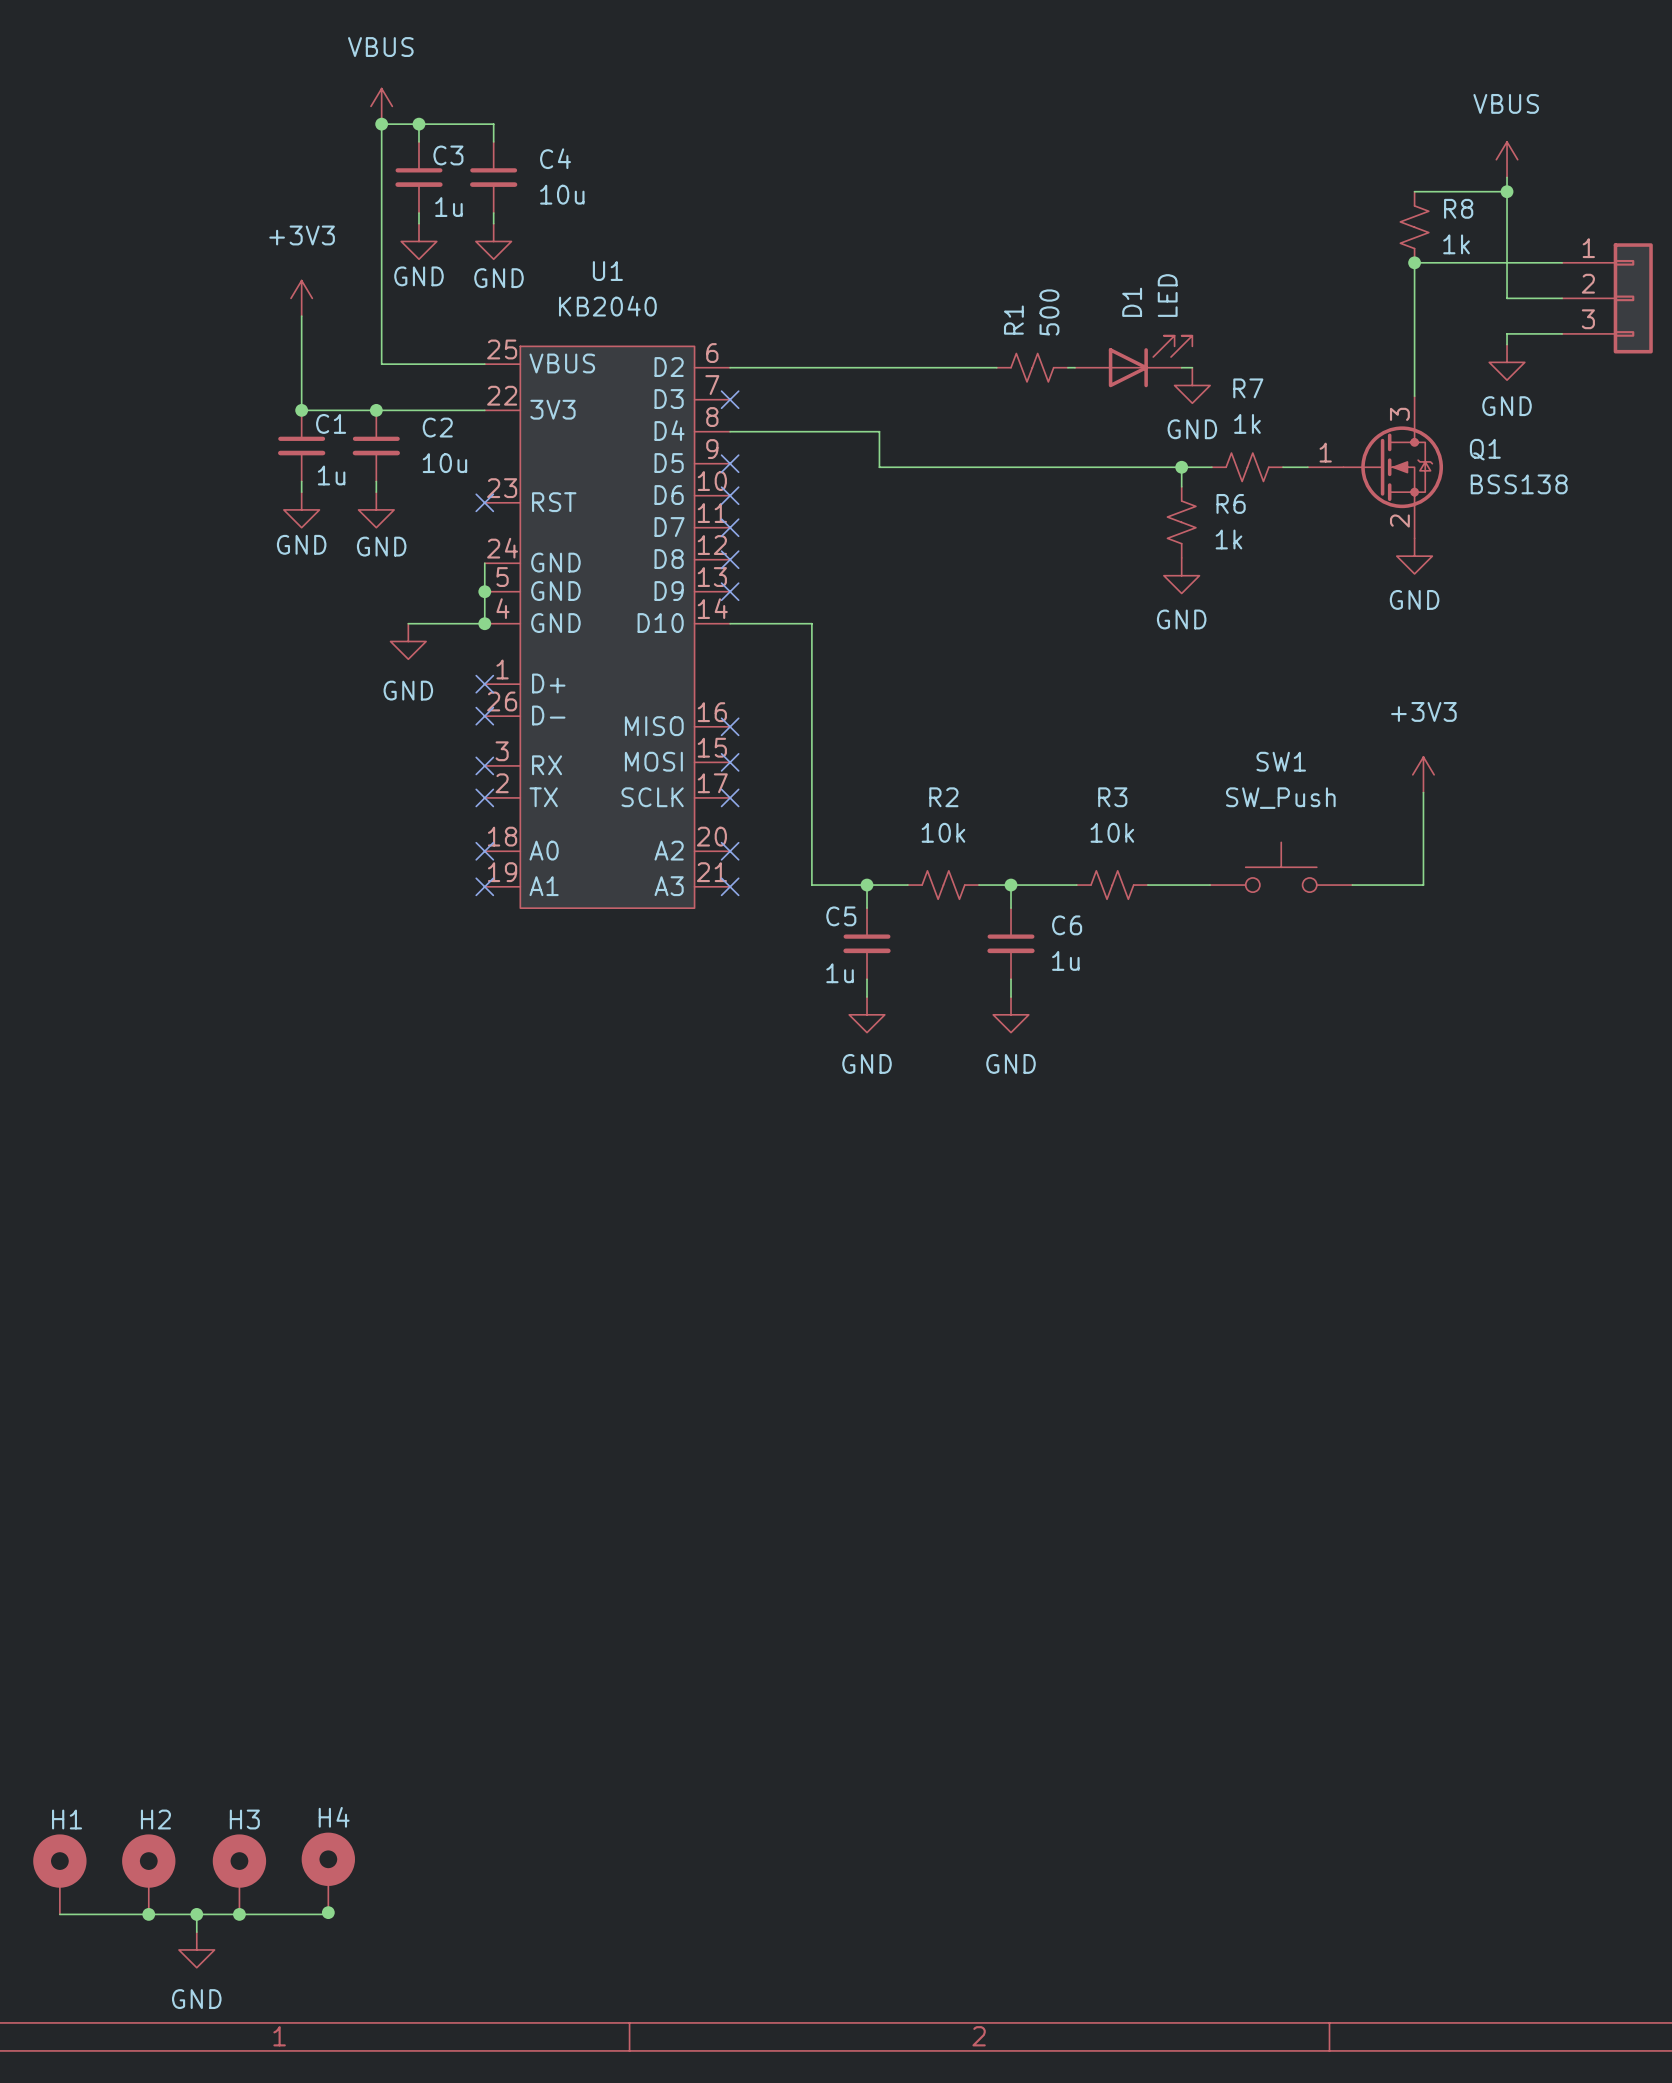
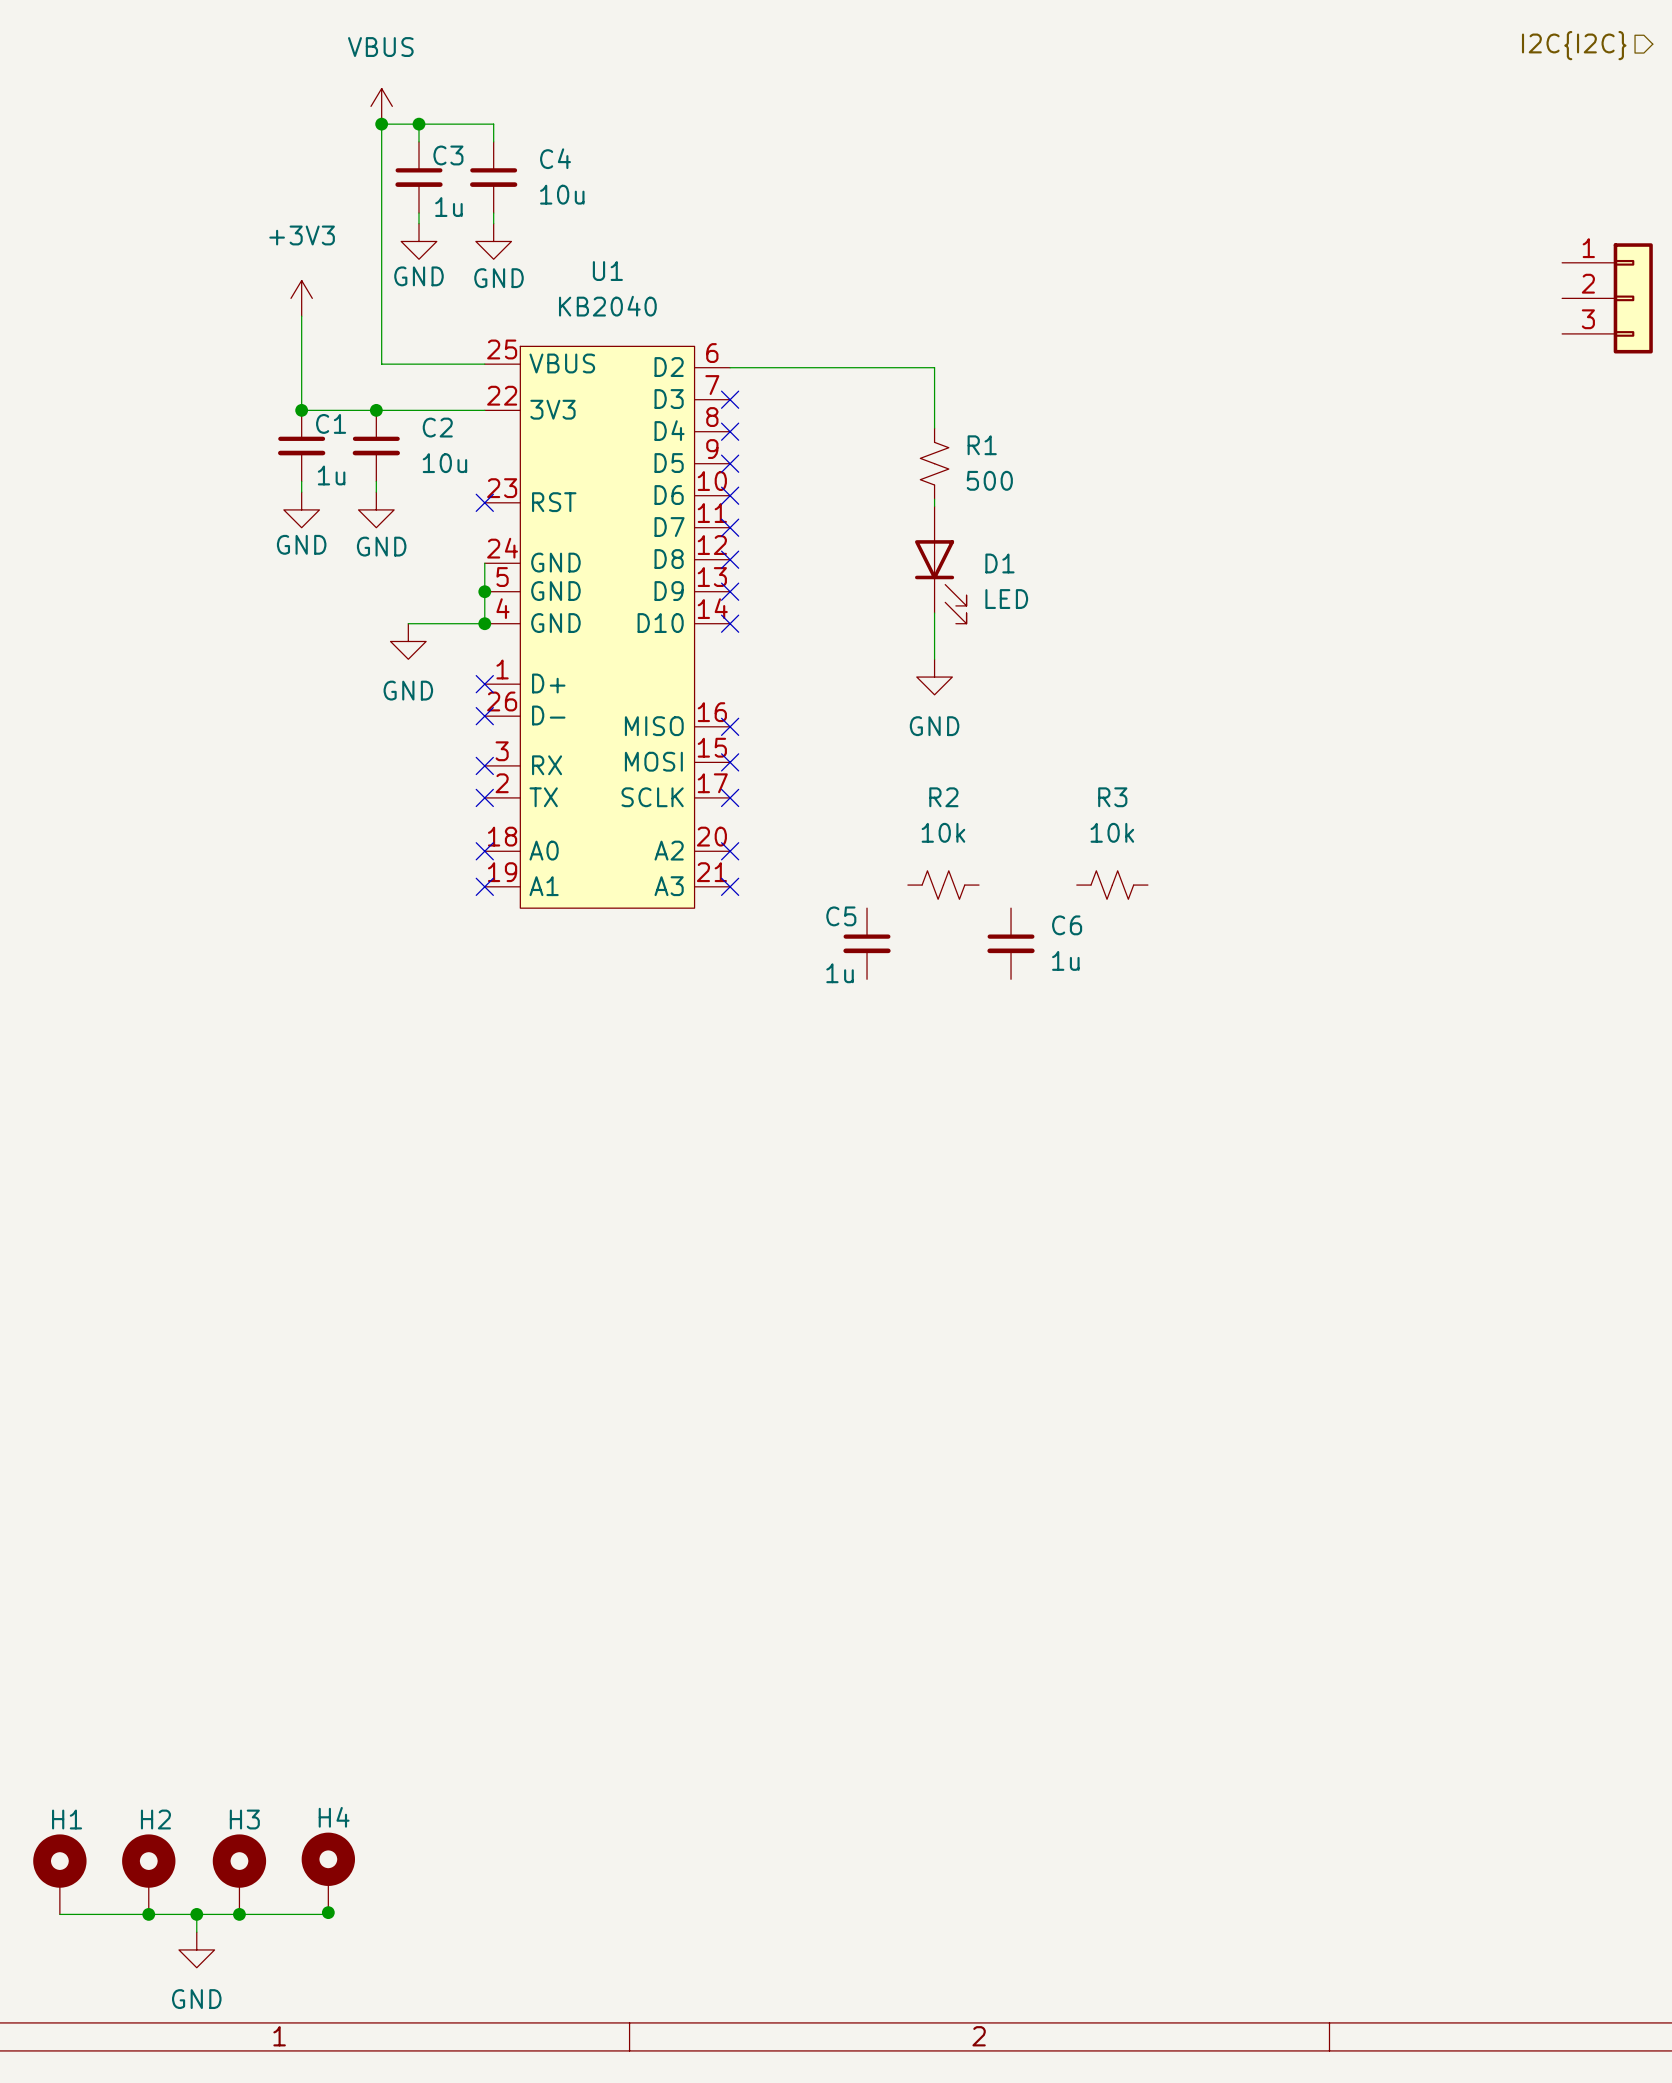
hierarchical label: none -> I2C{I2C} (1574, 45)
power symbol: VBUS (1507, 159) -> none
wire: (1507, 177) (1507, 298) (1562, 298) -> none
wire: (1414, 191) (1507, 191) -> none
junction: (1507, 191) -> none
R8: 1k (1414, 227) -> none
junction: (1414, 262) -> none
wire: (1562, 262) (1414, 262) (1414, 396) -> none
wire: (1562, 333) (1507, 333) (1507, 344) -> none
D1 position: (1133, 361) -> (940, 565)
D1 rotation: 0° (1150, 361) -> 90° clockwise (940, 581)
power symbol: GND (1507, 362) -> none
wire: (934, 367) (996, 367) -> (934, 367) (934, 428)
R1 rotation: 0° (1032, 367) -> 90° clockwise (934, 463)
R1 position: (1032, 367) -> (934, 463)
wire: (1067, 367) (1075, 367) -> none
wire: (1181, 367) (1192, 367) -> none
power symbol: GND (1192, 385) -> none
wire: (730, 431) (879, 431) (879, 467) (1211, 467) -> none
no-connect mark: none -> (730, 431)
wire: (1181, 467) (1181, 486) -> none
junction: (1181, 467) -> none
R7: 1k (1247, 467) -> none
wire: (1283, 467) (1307, 467) -> none
Q1: BSS138 (1375, 467) -> none
wire: none -> (934, 499) (934, 506)
R6: 1k (1181, 522) -> none
power symbol: GND (1414, 556) -> none
power symbol: GND (1181, 575) -> none
wire: none -> (934, 613) (934, 659)
wire: (730, 623) (811, 623) (811, 885) (907, 885) -> none
no-connect mark: none -> (730, 623)
power symbol: none -> GND (934, 677)
power symbol: +3V3 (1423, 774) -> none
wire: (1423, 792) (1423, 885) (1352, 885) -> none
SW1: SW_Push (1281, 867) -> none
wire: (867, 885) (867, 908) -> none
junction: (867, 885) -> none
wire: (979, 885) (1076, 885) -> none
wire: (1011, 885) (1011, 908) -> none
junction: (1011, 885) -> none
wire: (1147, 885) (1210, 885) -> none
wire: (867, 979) (867, 997) -> none
wire: (1011, 979) (1011, 997) -> none
power symbol: GND (867, 1014) -> none
power symbol: GND (1011, 1014) -> none

